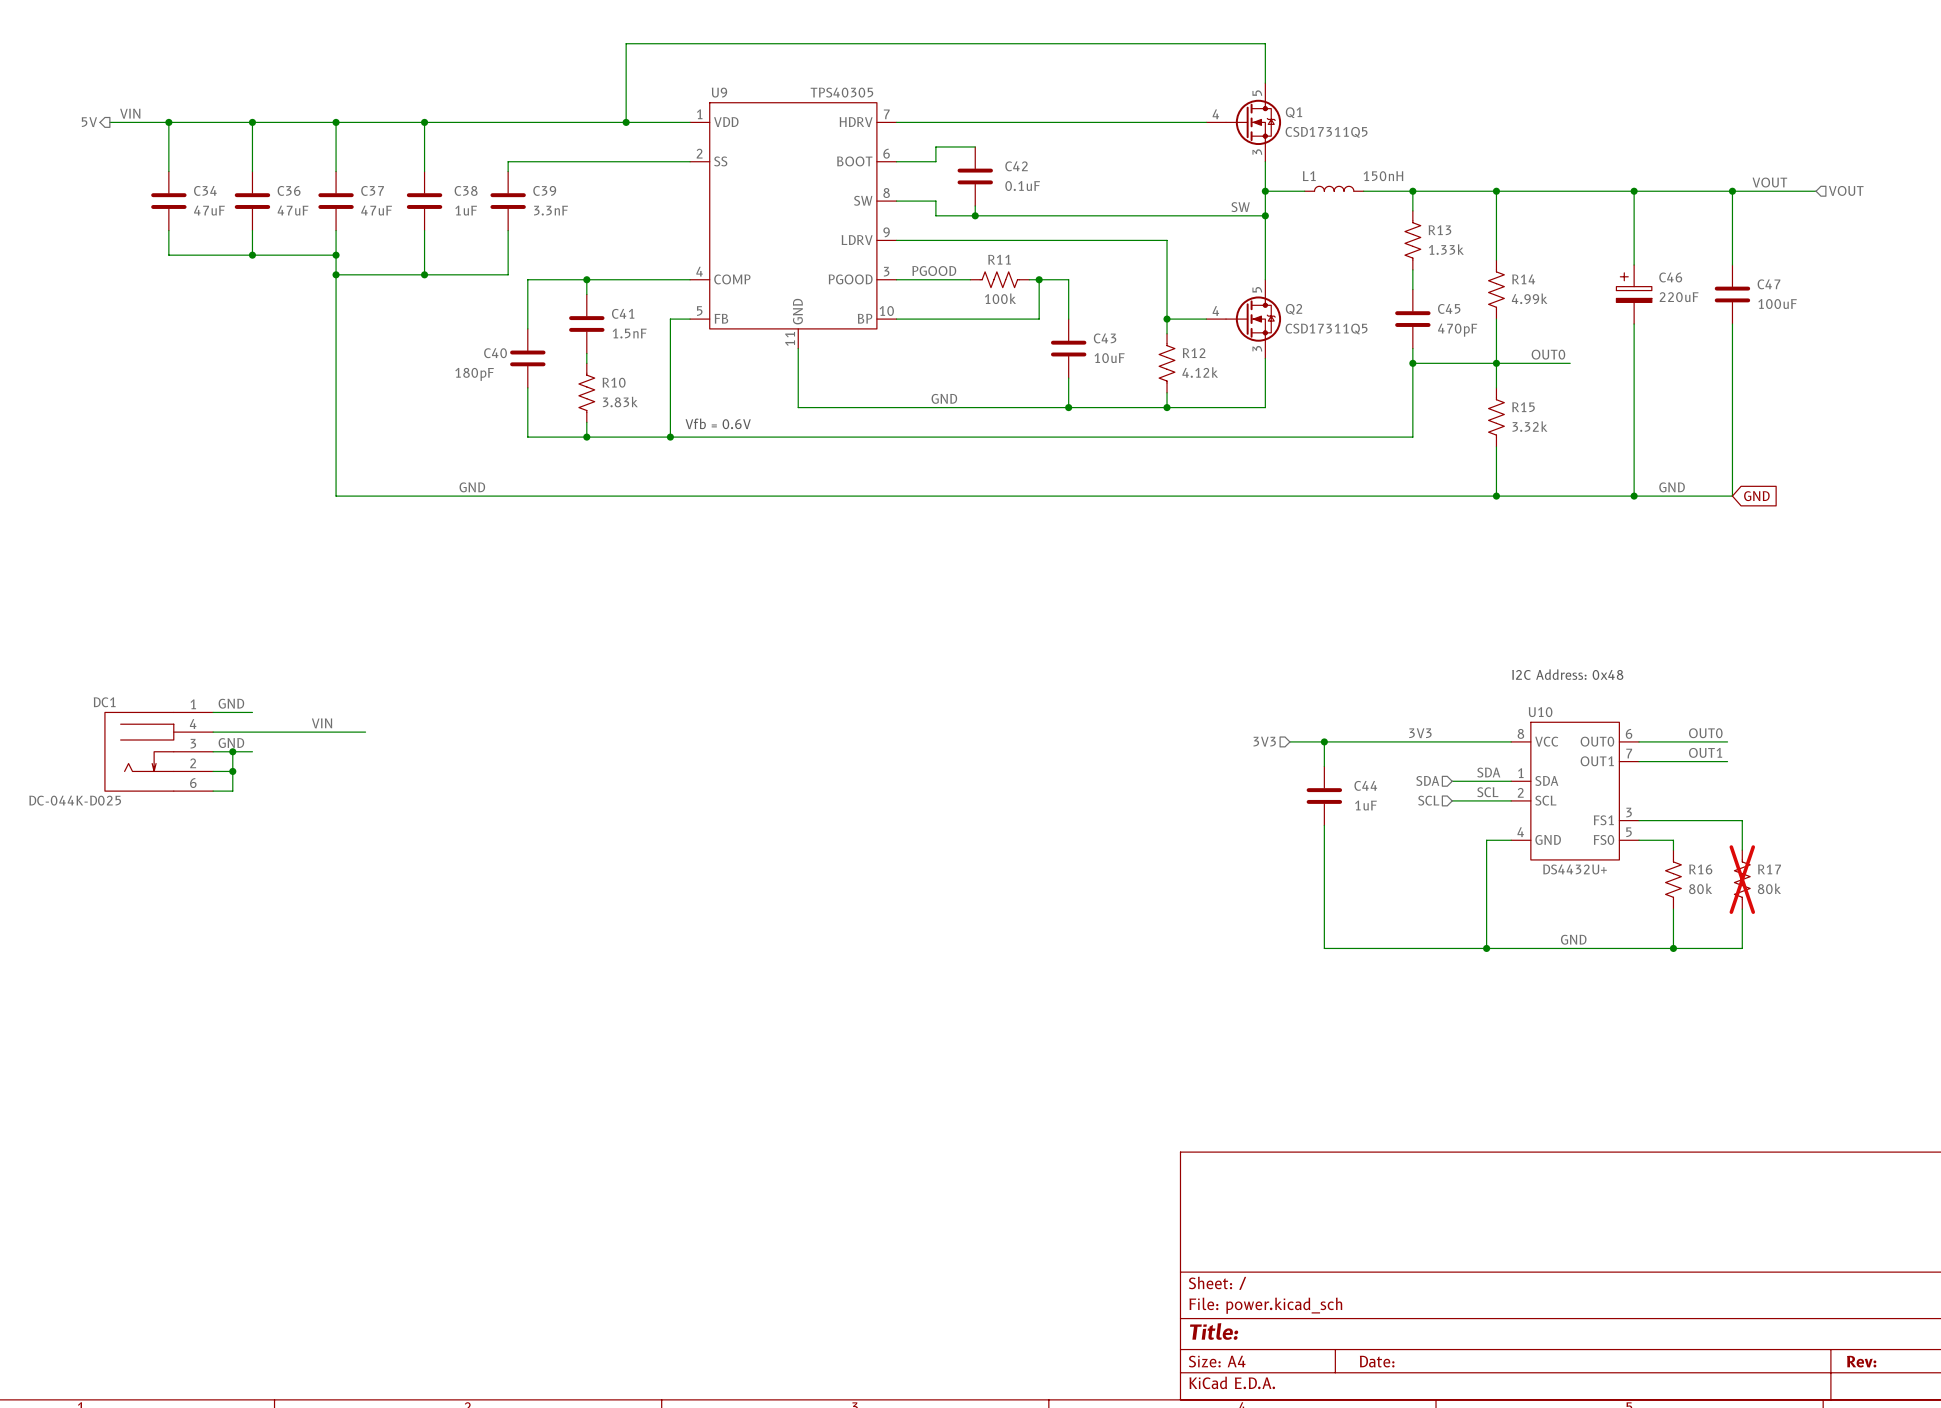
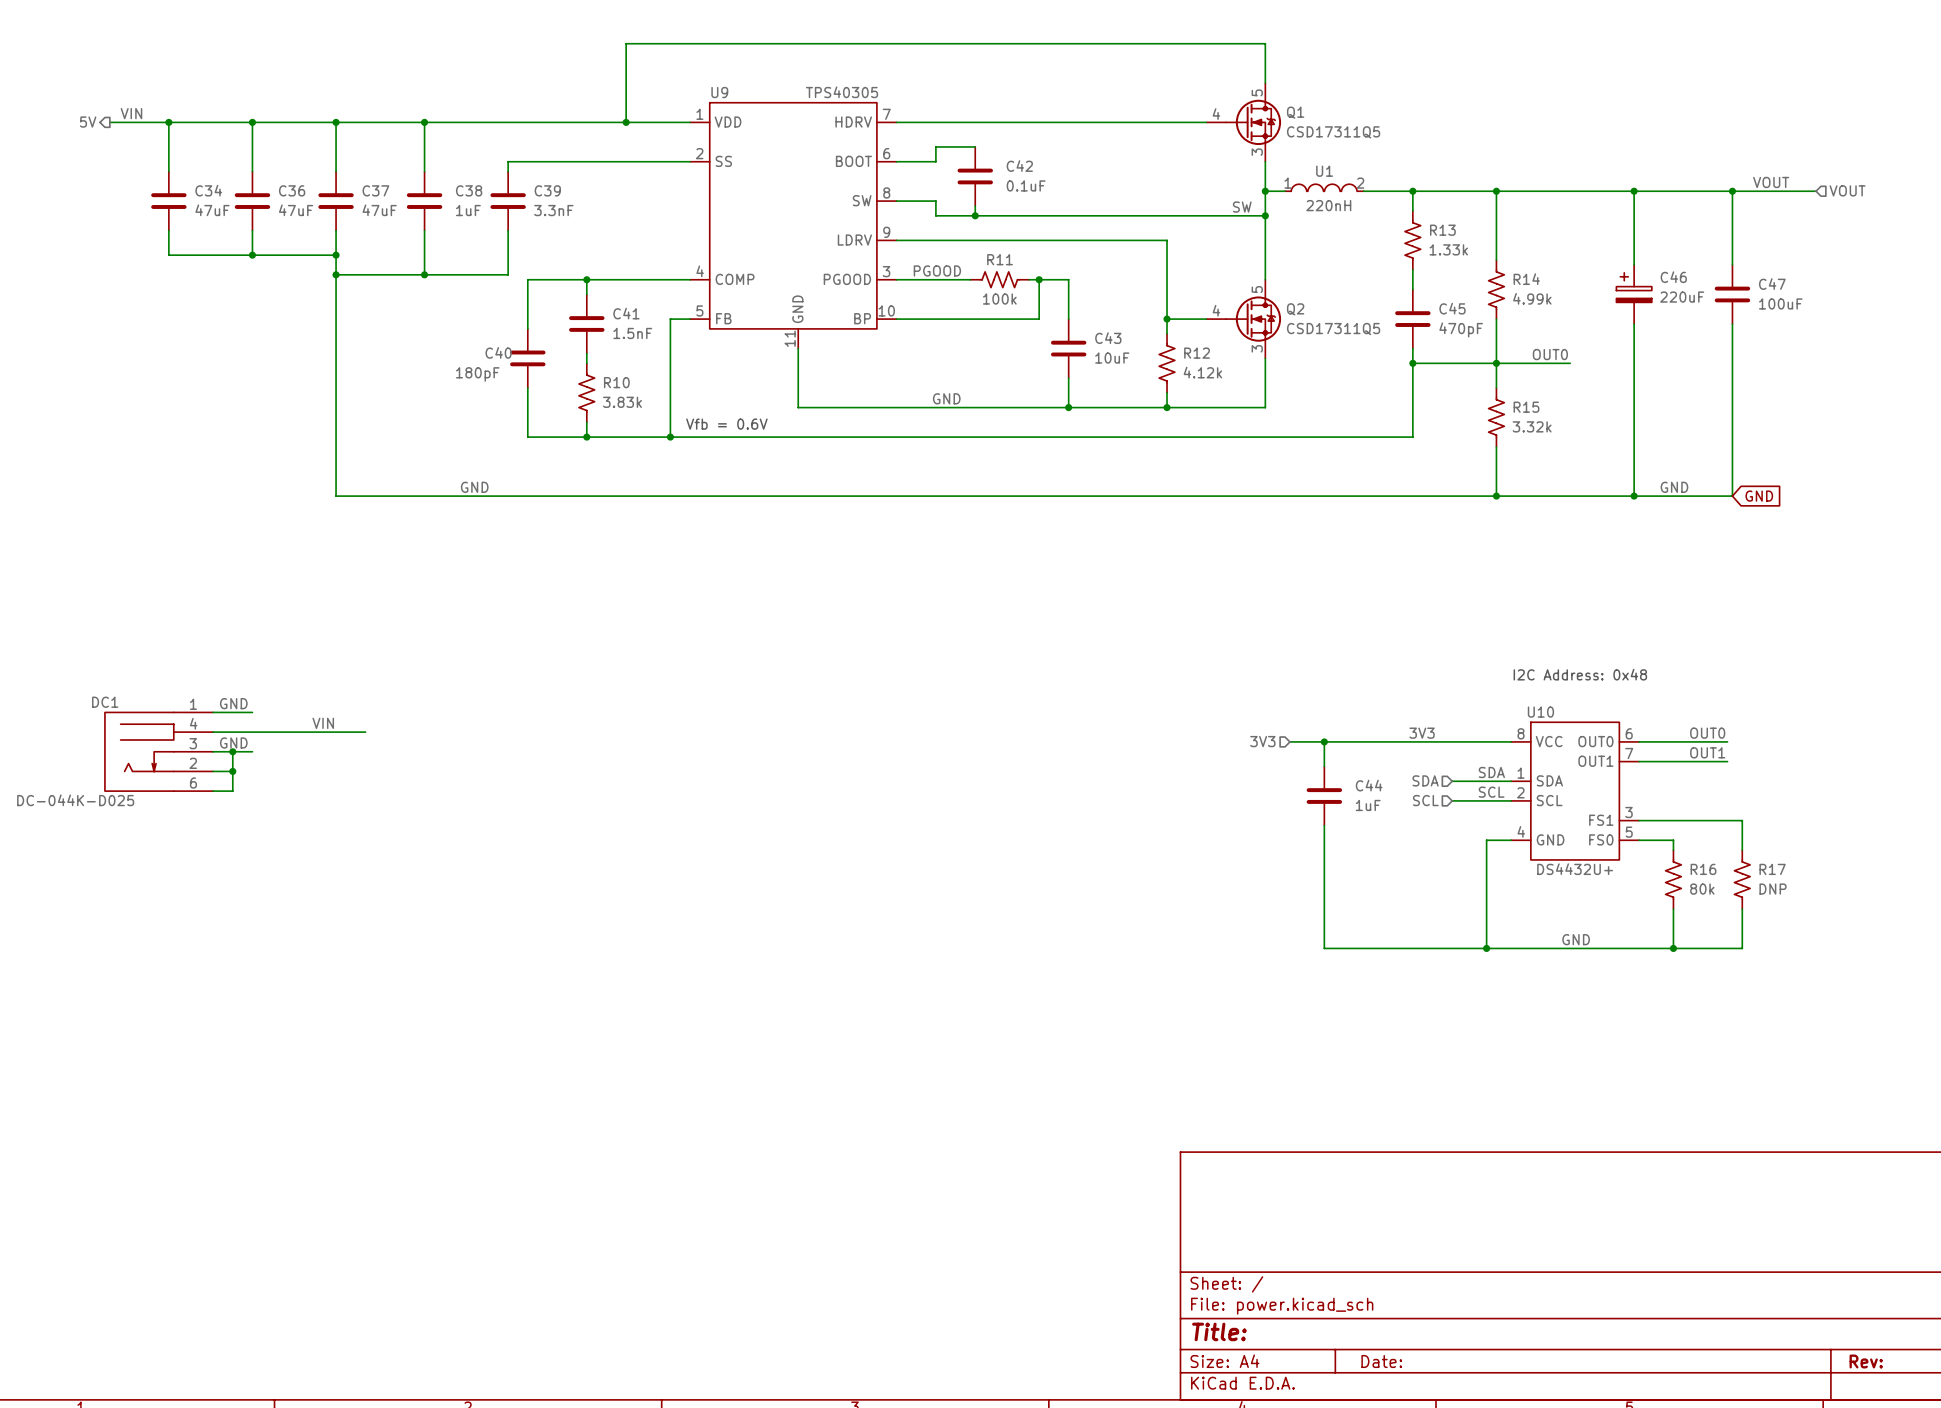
U1: none -> 220nH (1324, 187)
L1: 150nH (1334, 188) -> none
wire: (1285, 191) (1304, 191) -> none
R17 do-not-place cross: (1742, 879) -> none
R17 value: 80k (1769, 888) -> DNP (1773, 889)

